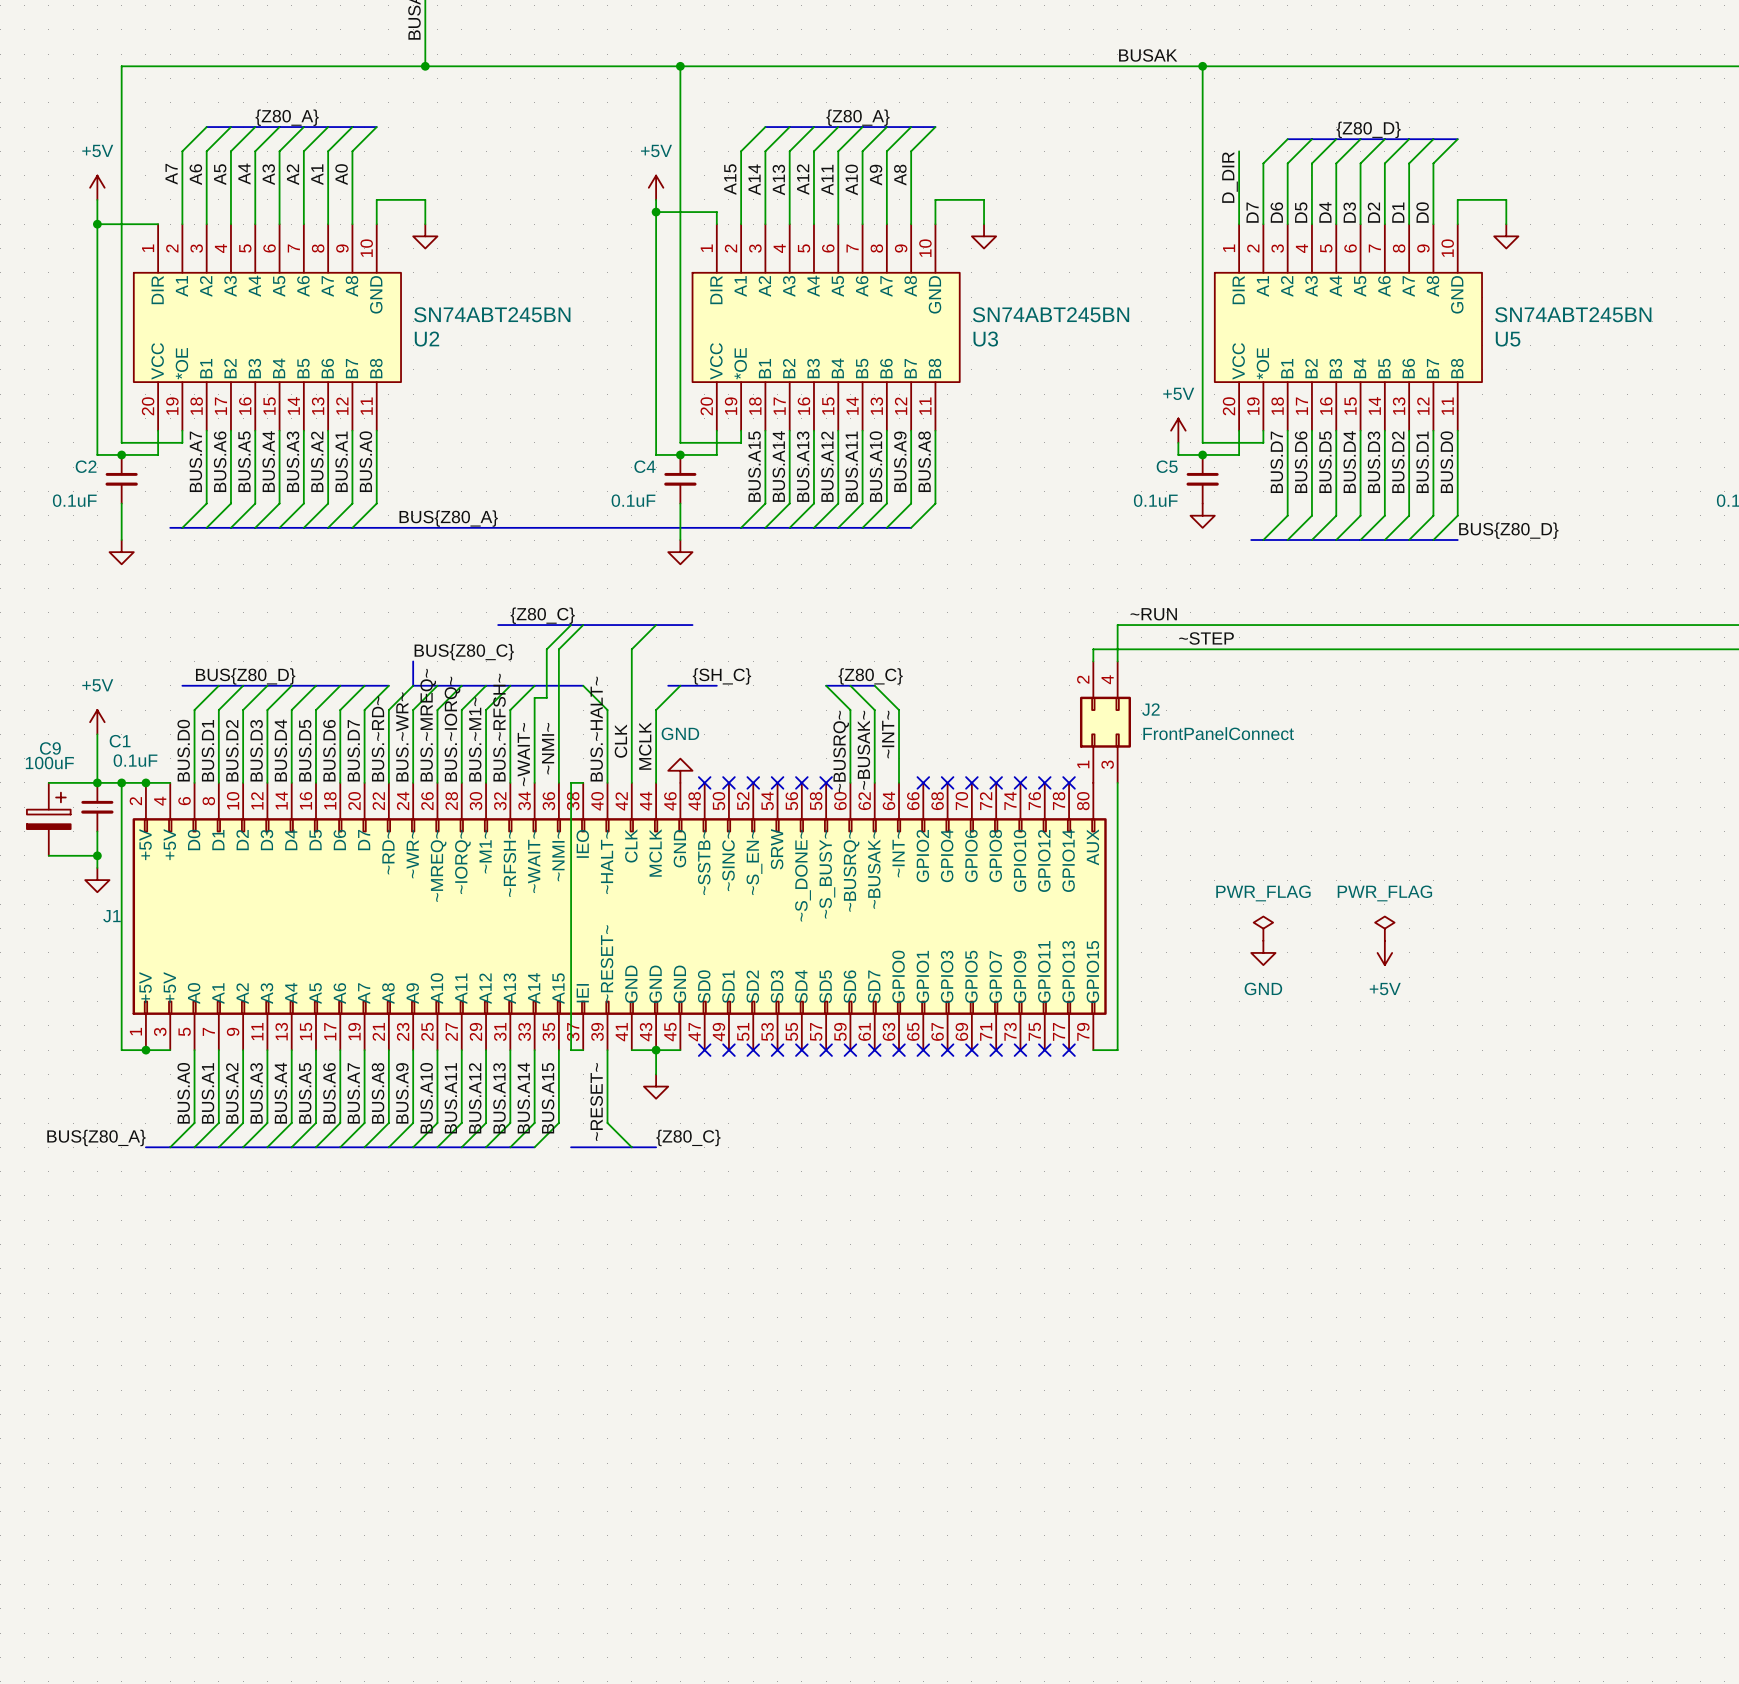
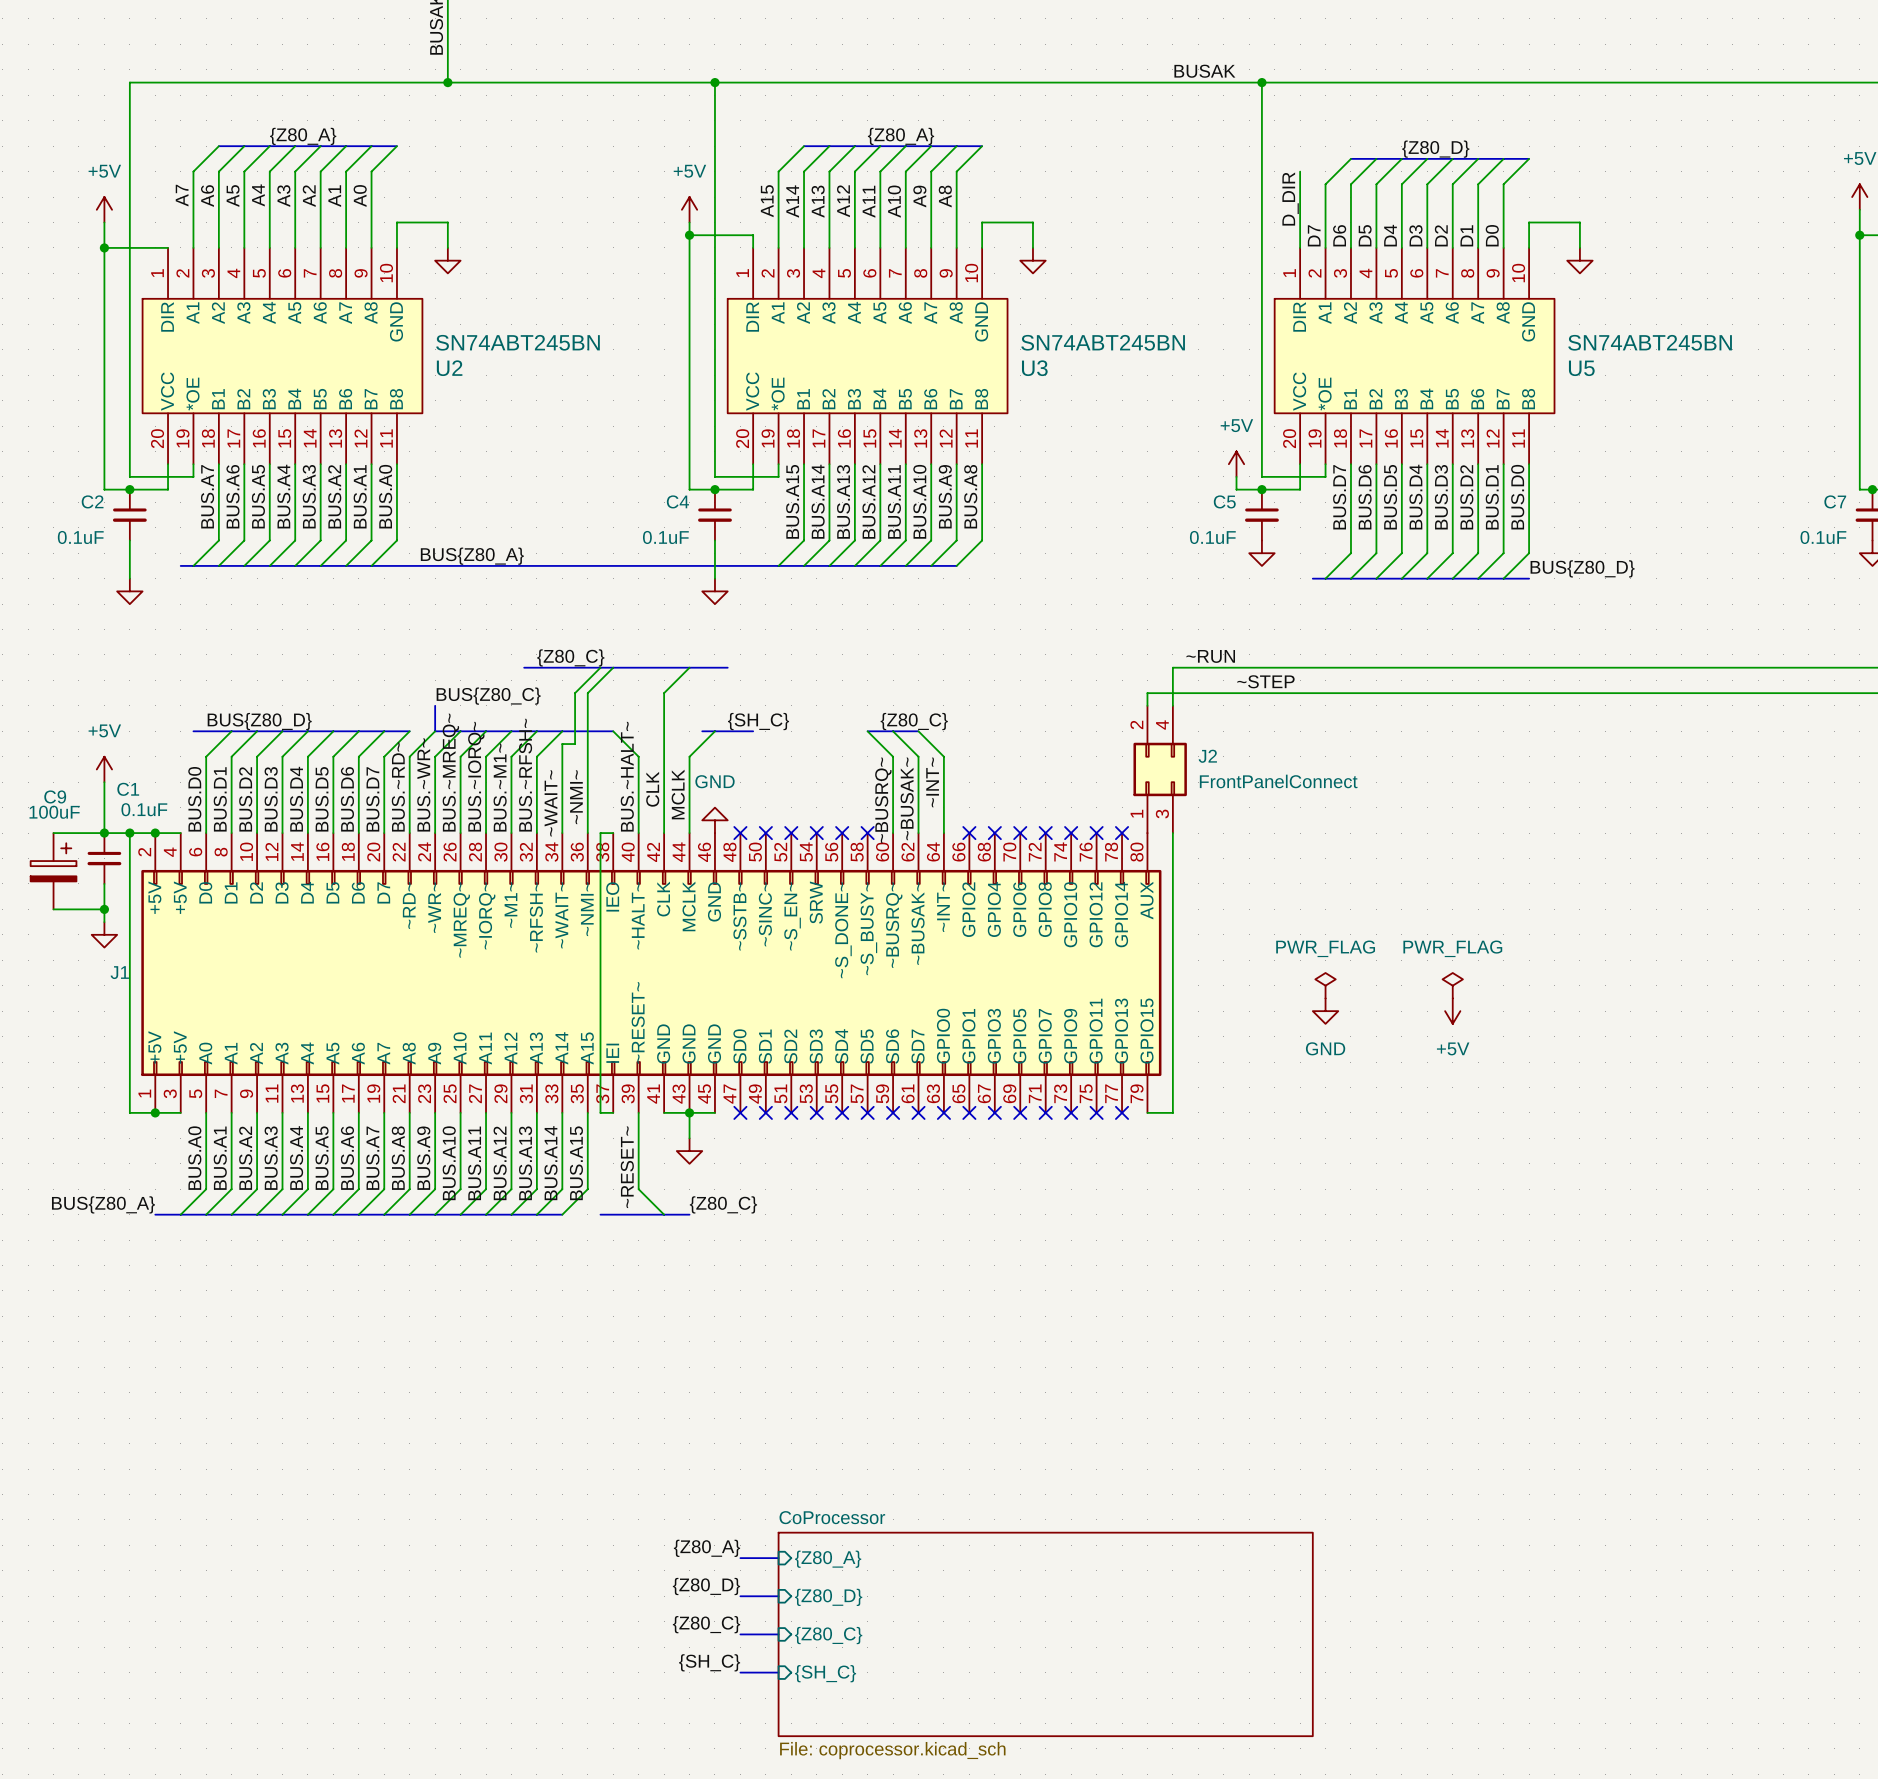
label: none -> {Z80_A} (706, 1548)
bus: none -> (740, 1558) (778, 1558)
sheet pin: none -> {Z80_A} (828, 1559)
label: none -> {Z80_D} (706, 1586)
bus: none -> (740, 1596) (778, 1596)
sheet pin: none -> {Z80_D} (828, 1597)
label: none -> {Z80_C} (706, 1624)
bus: none -> (740, 1634) (778, 1634)
sheet CoProcessor: none -> File: coprocessor.kicad_sch (1045, 1634)
sheet pin: none -> {Z80_C} (828, 1635)
label: none -> {SH_C} (709, 1662)
bus: none -> (740, 1672) (778, 1672)
sheet pin: none -> {SH_C} (825, 1673)

